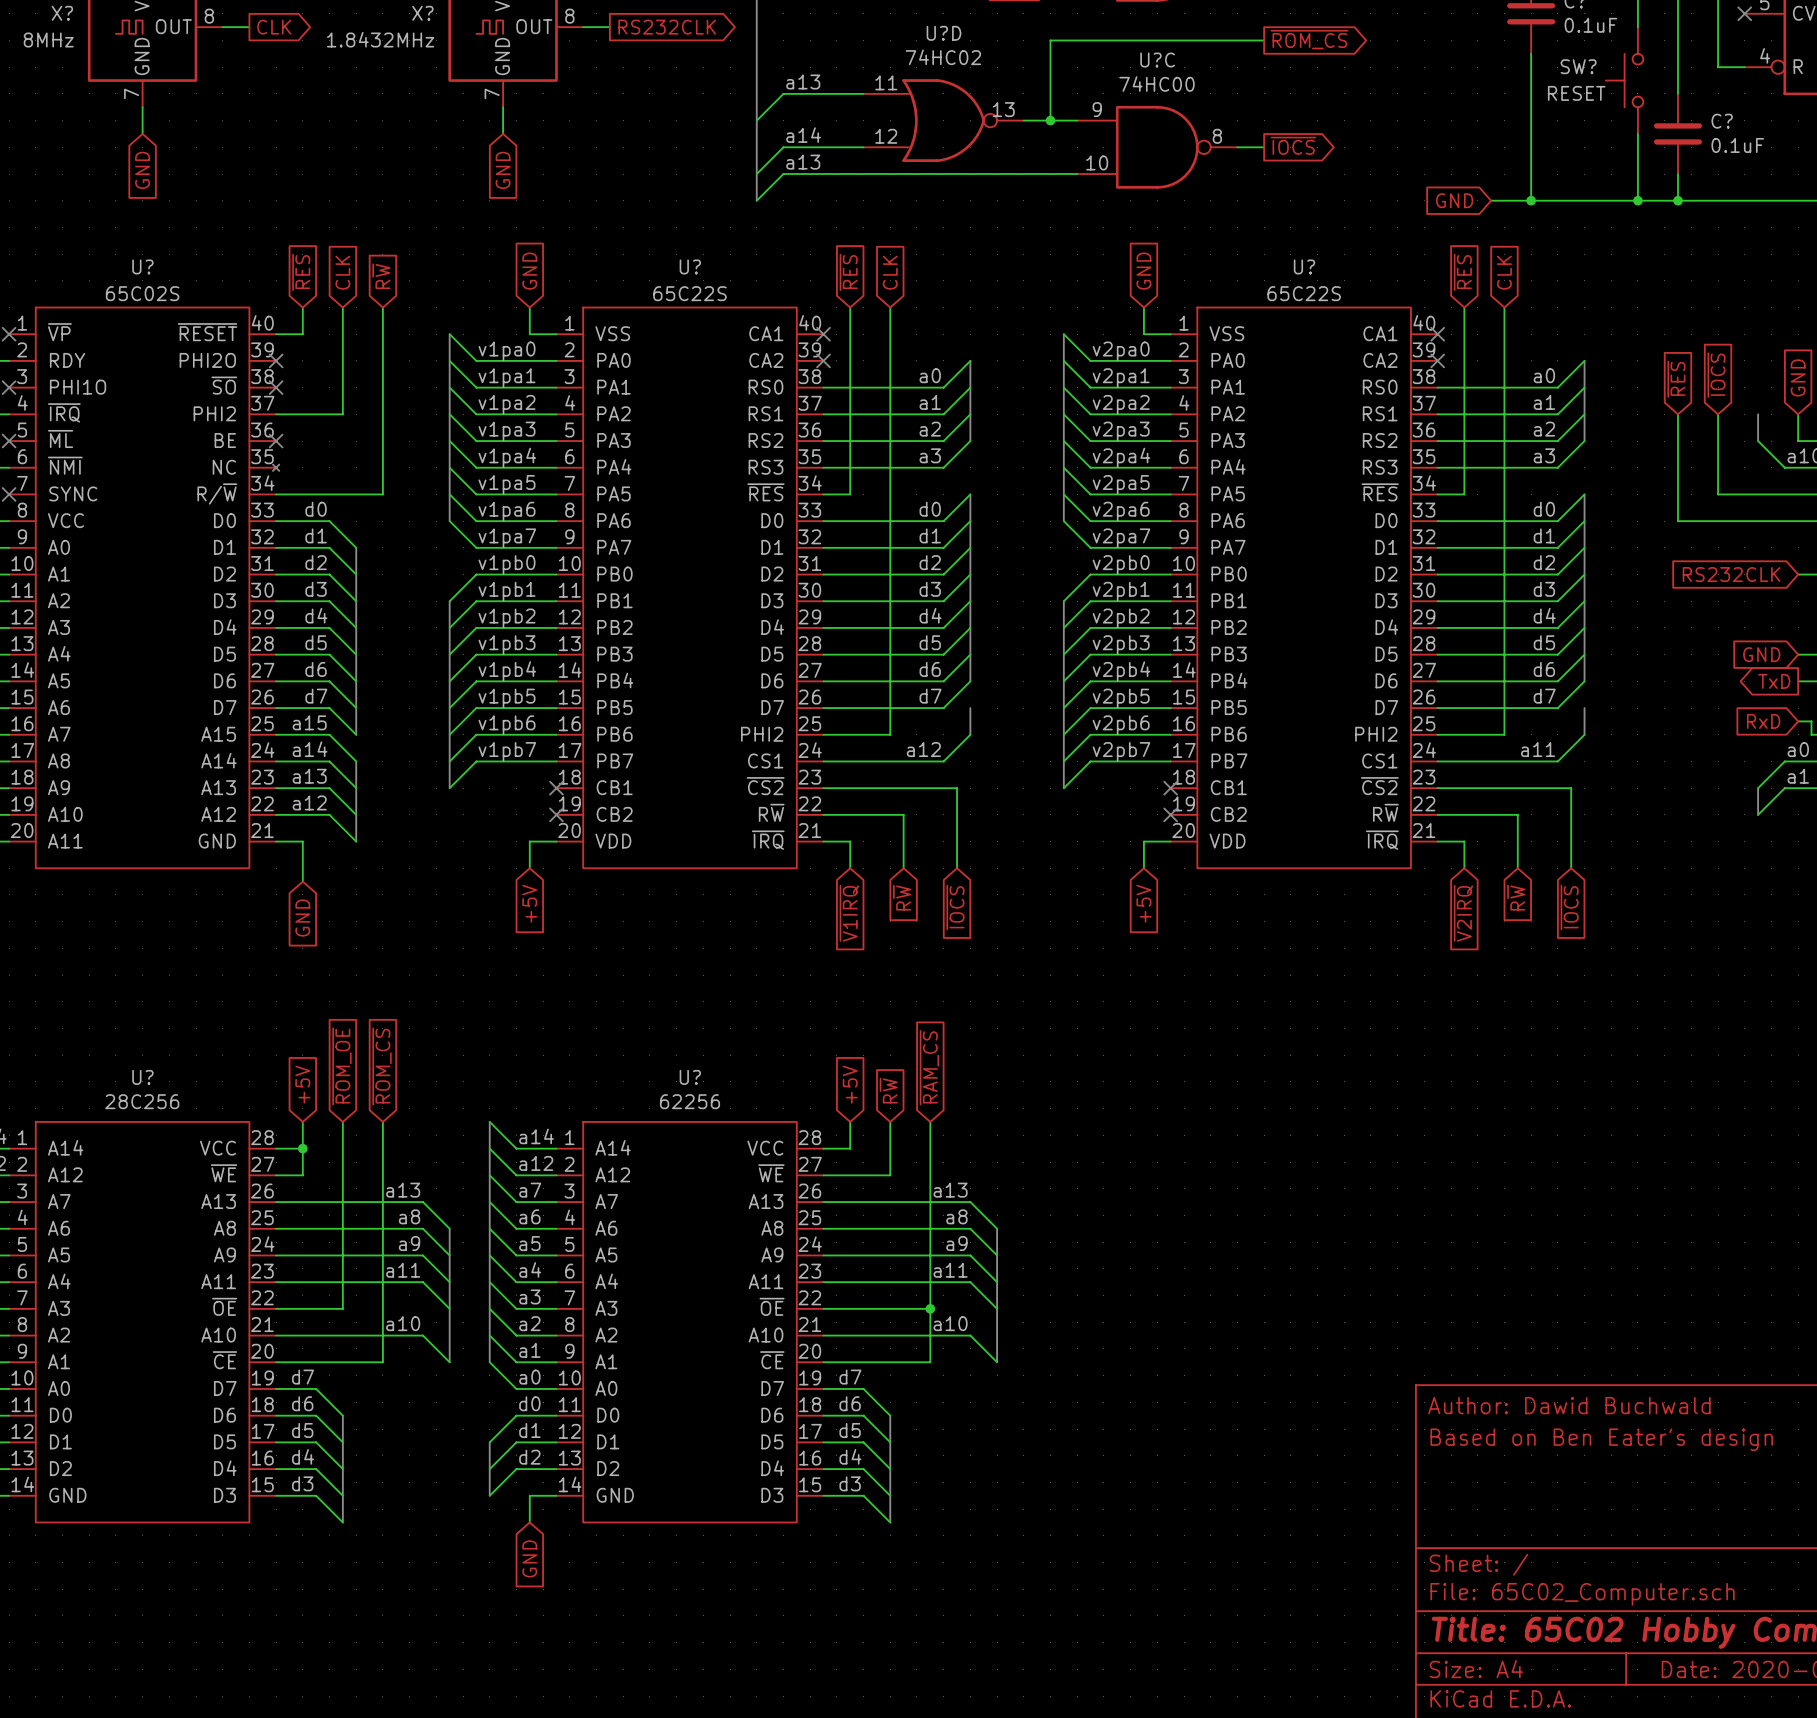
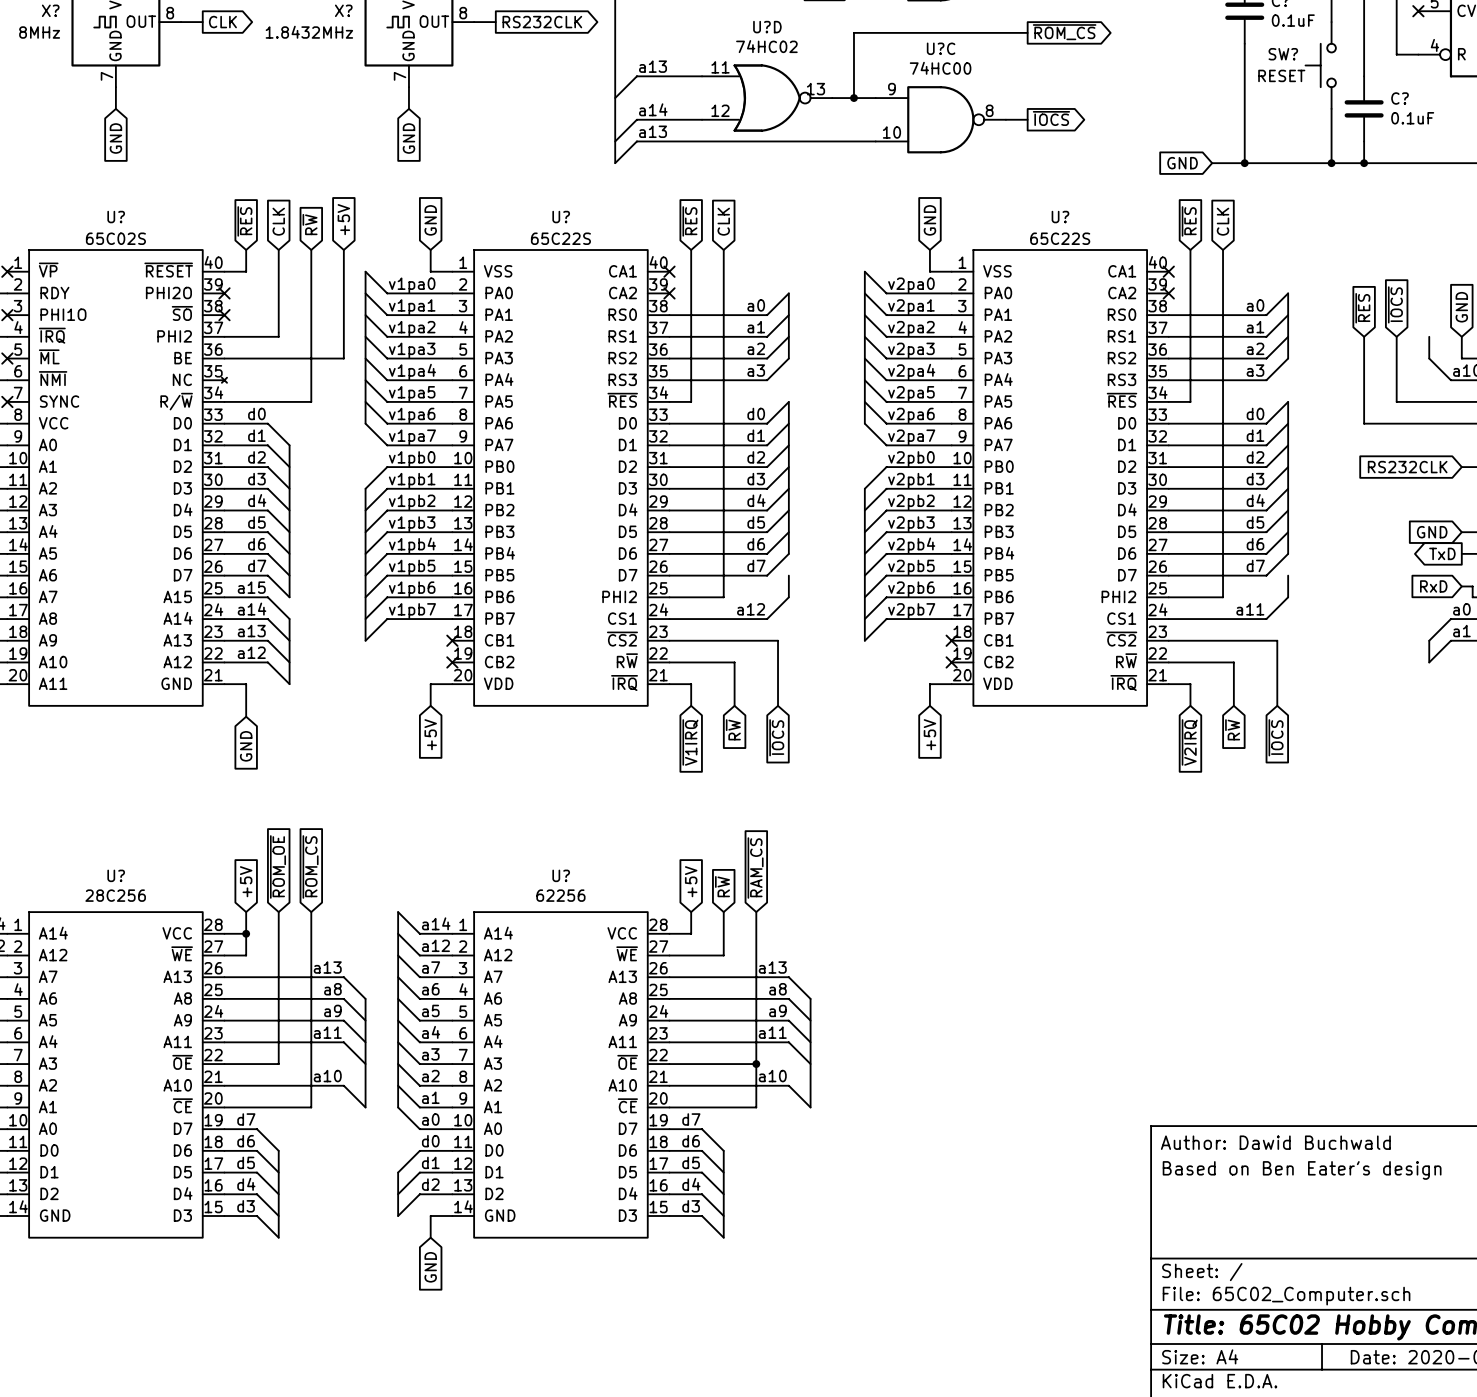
global label: none -> +5V (343, 219)
wire: none -> (343, 250) (343, 358) (224, 358)
no-connect mark: (276, 441) -> none

